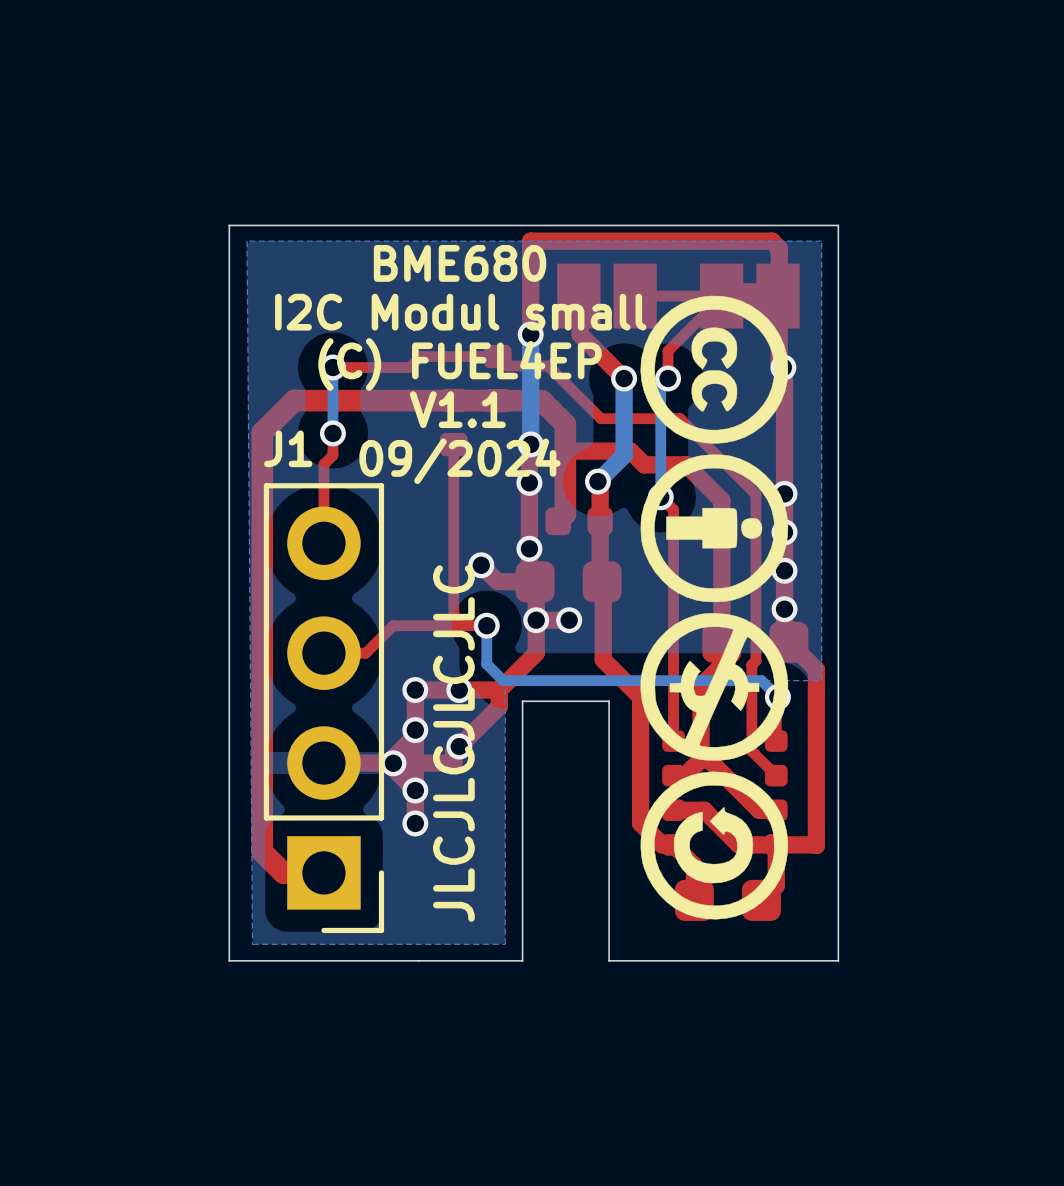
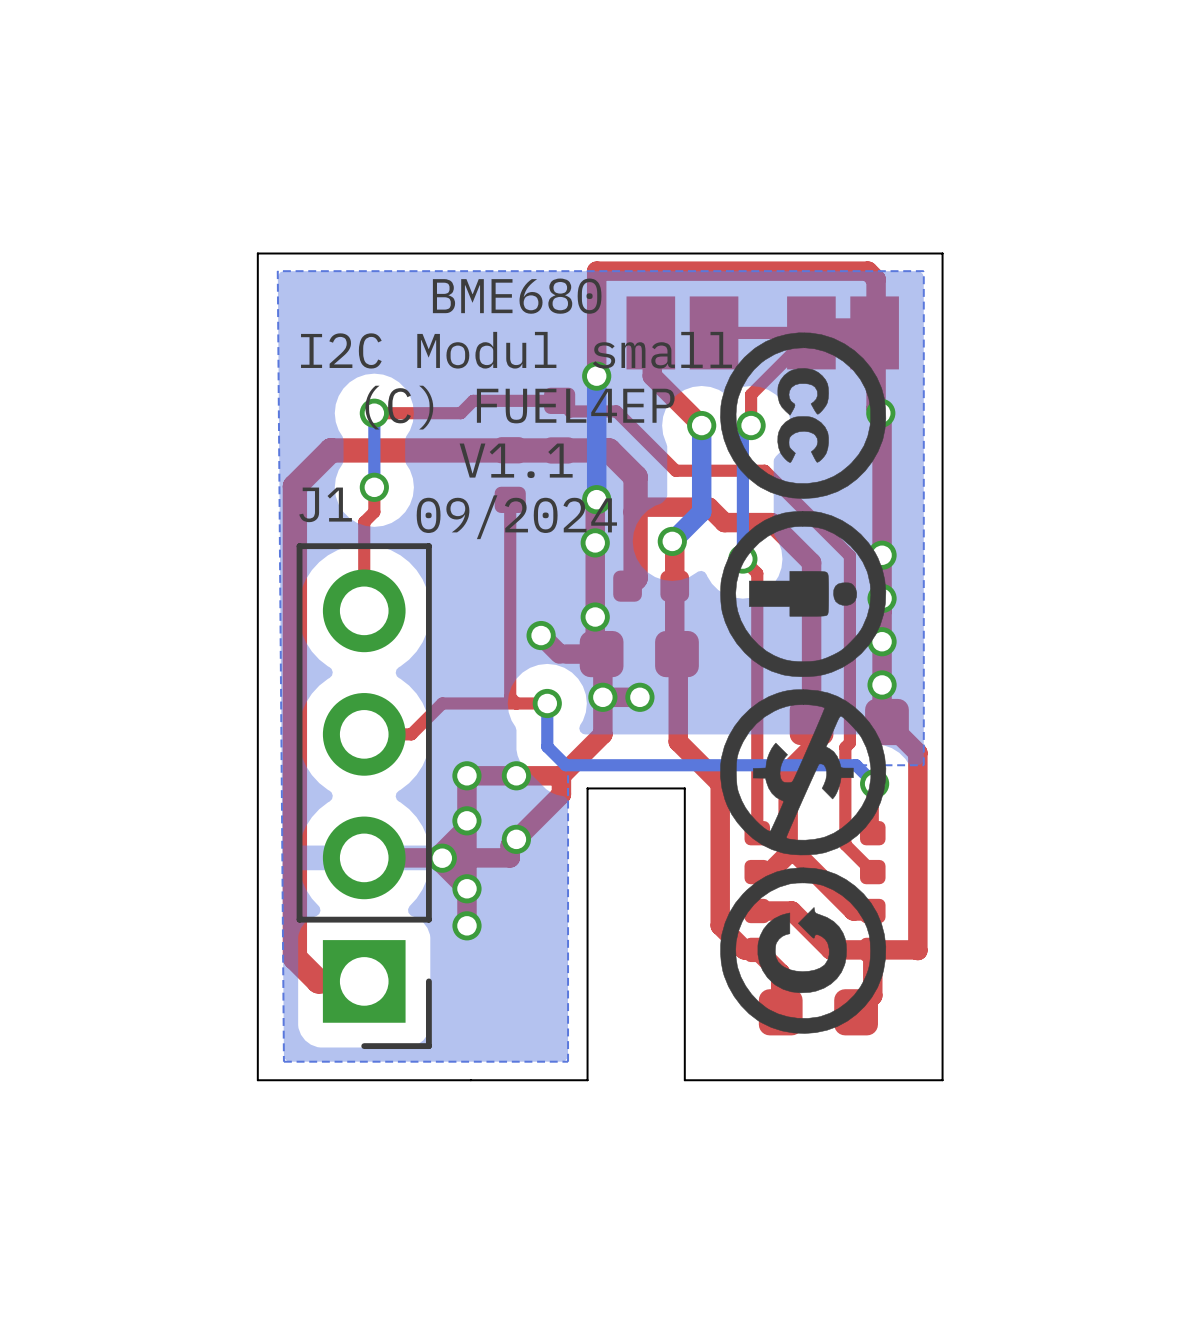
text: JLCJLCJLCJLC (453, 743) -> none

